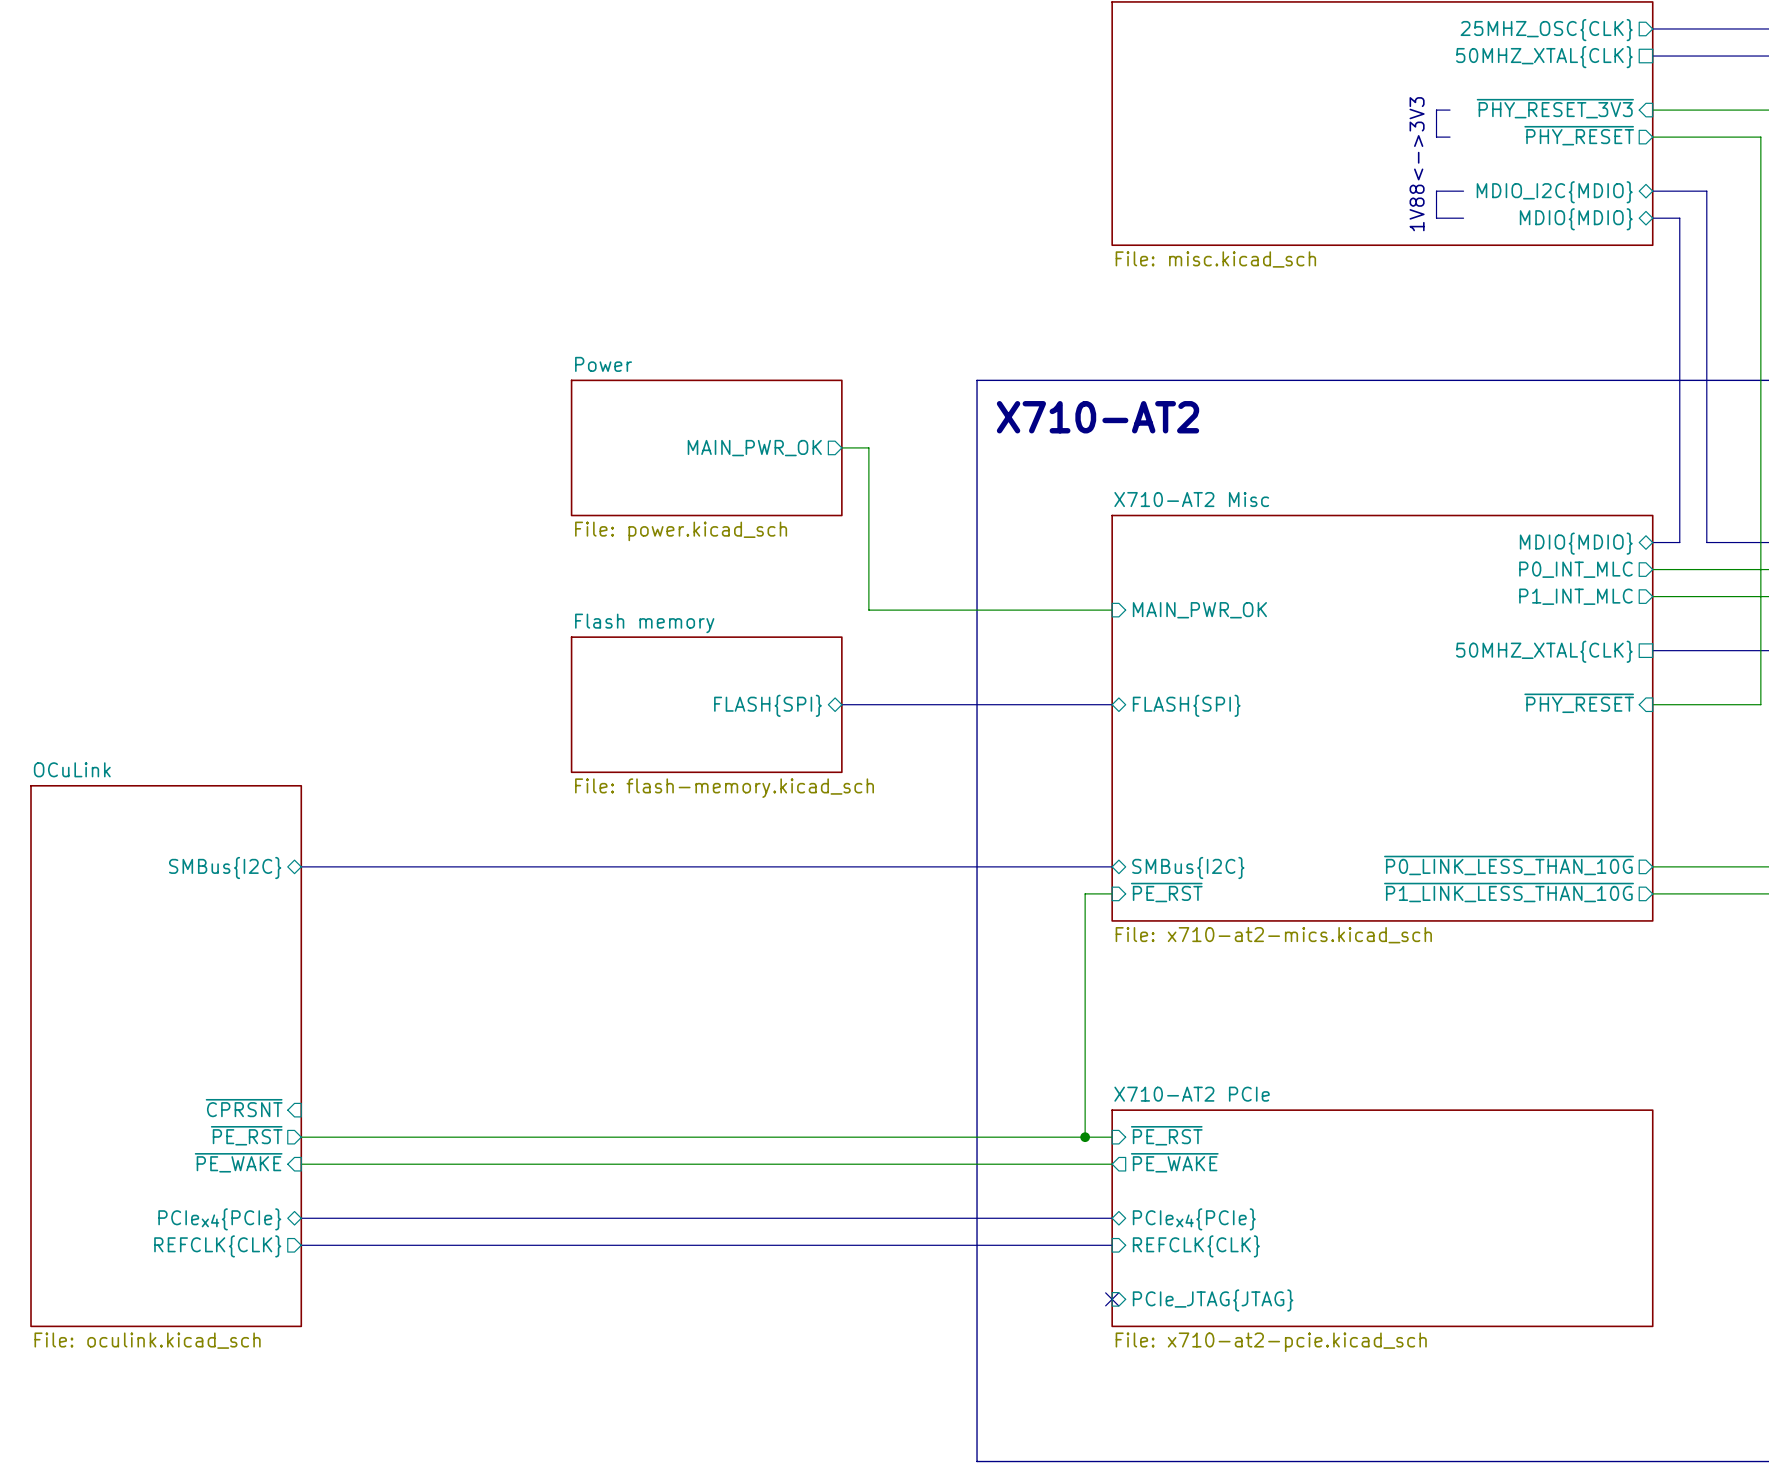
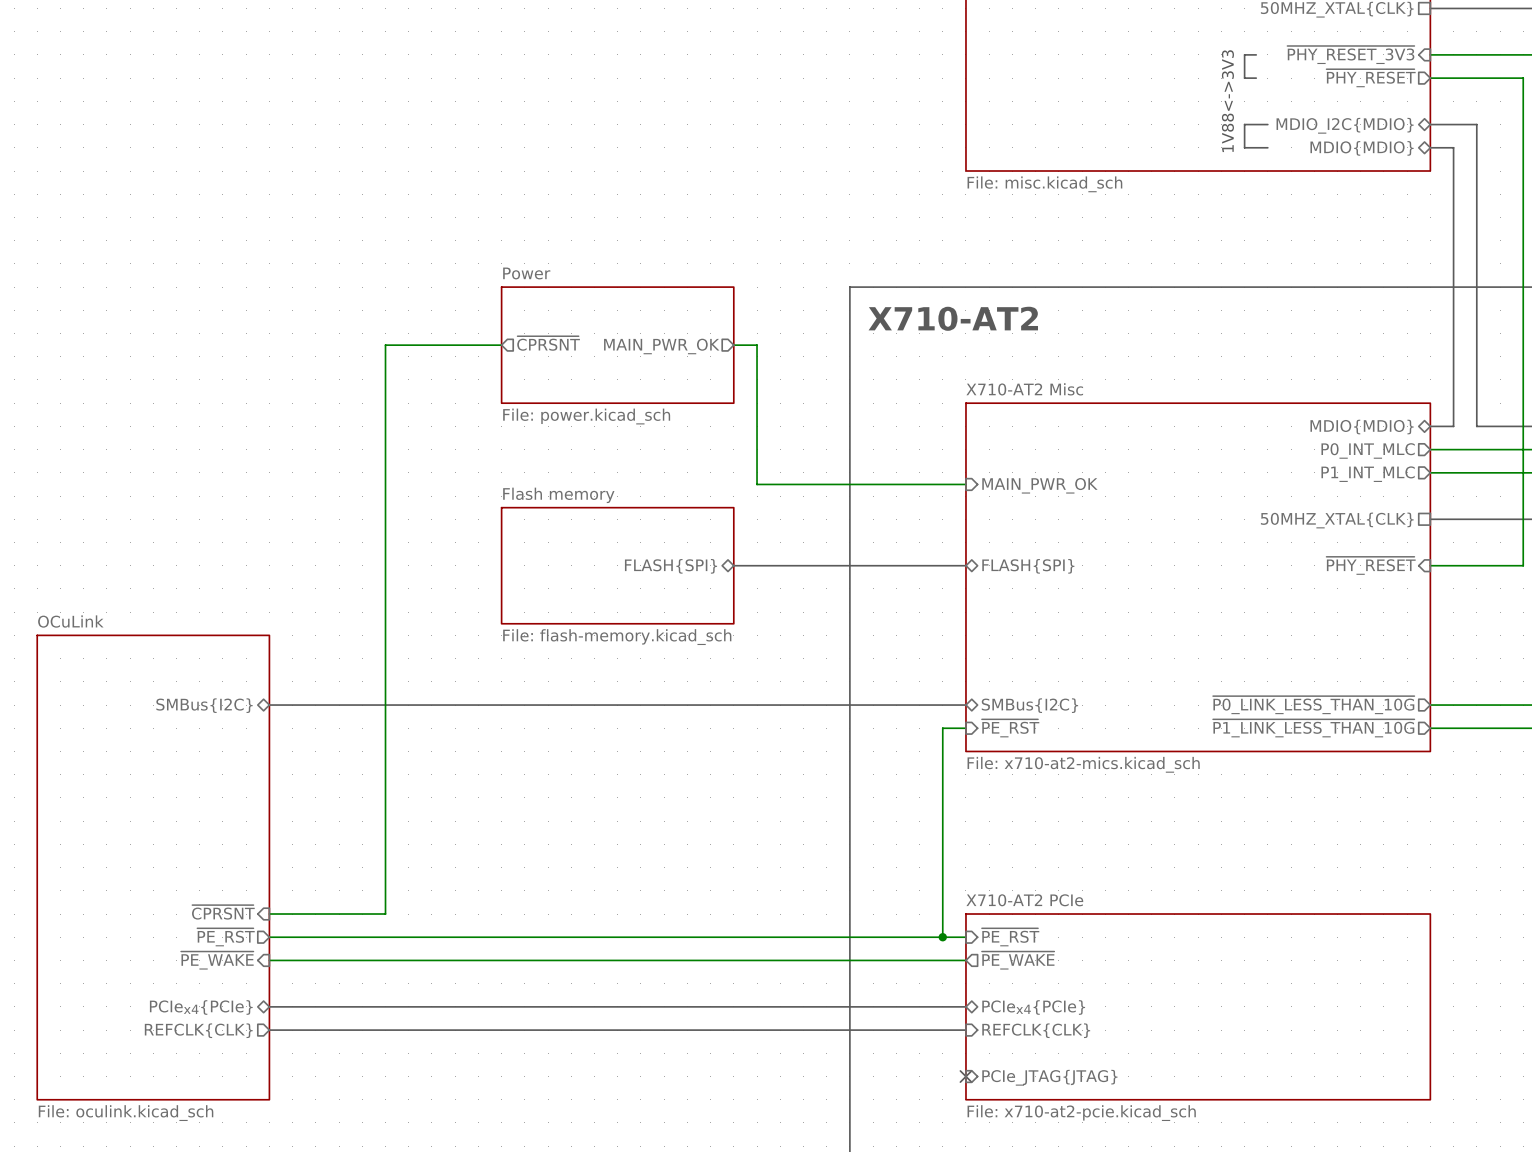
sheet pin: none -> ~{CPRSNT} (548, 343)
wire: none -> (501, 345) (385, 345) (385, 914) (269, 914)

